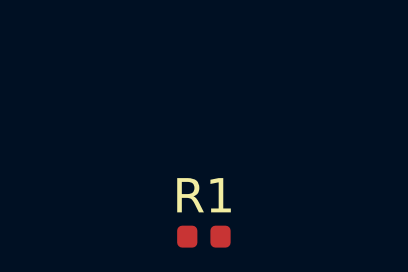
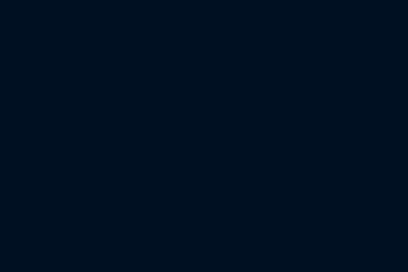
R1: (203, 236) -> none

